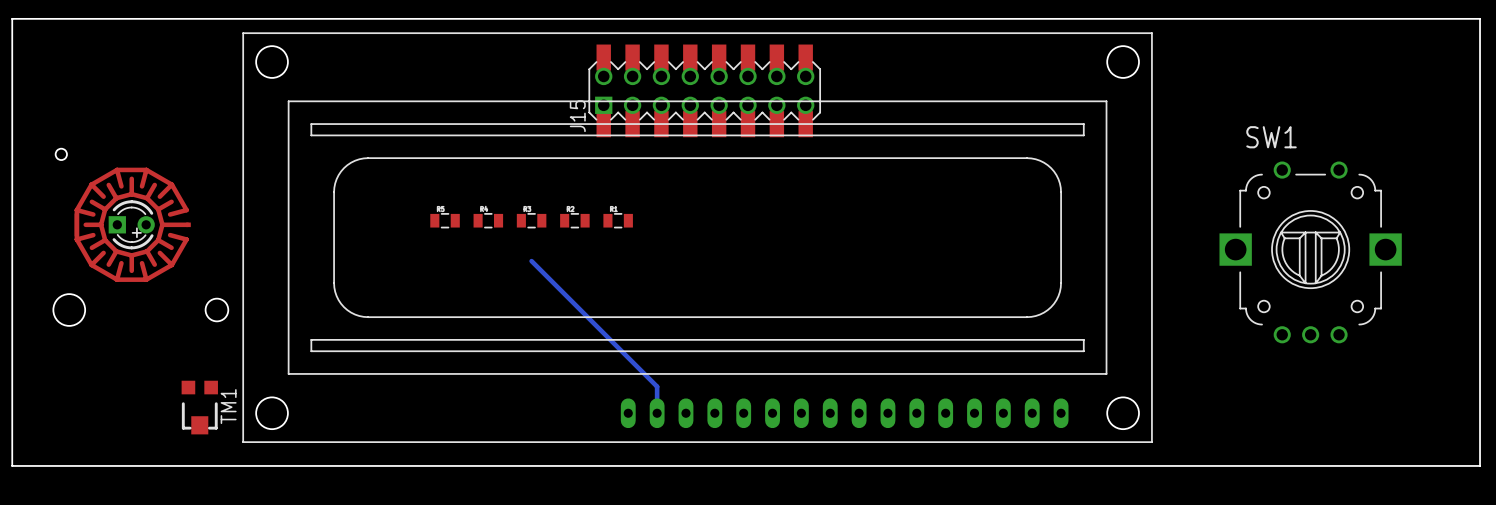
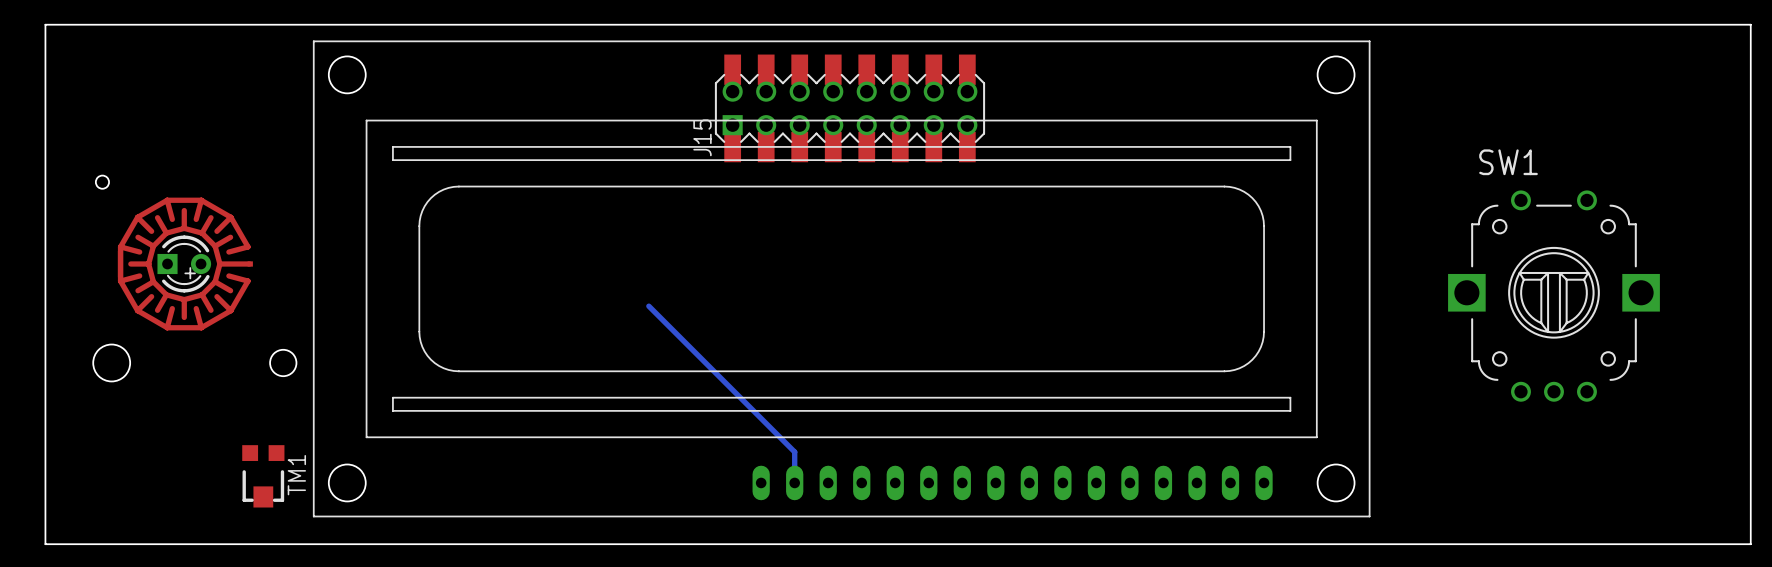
part: (445, 220) -> none
part: (488, 220) -> none
part: (531, 220) -> none
part: (574, 220) -> none
part: (618, 220) -> none

